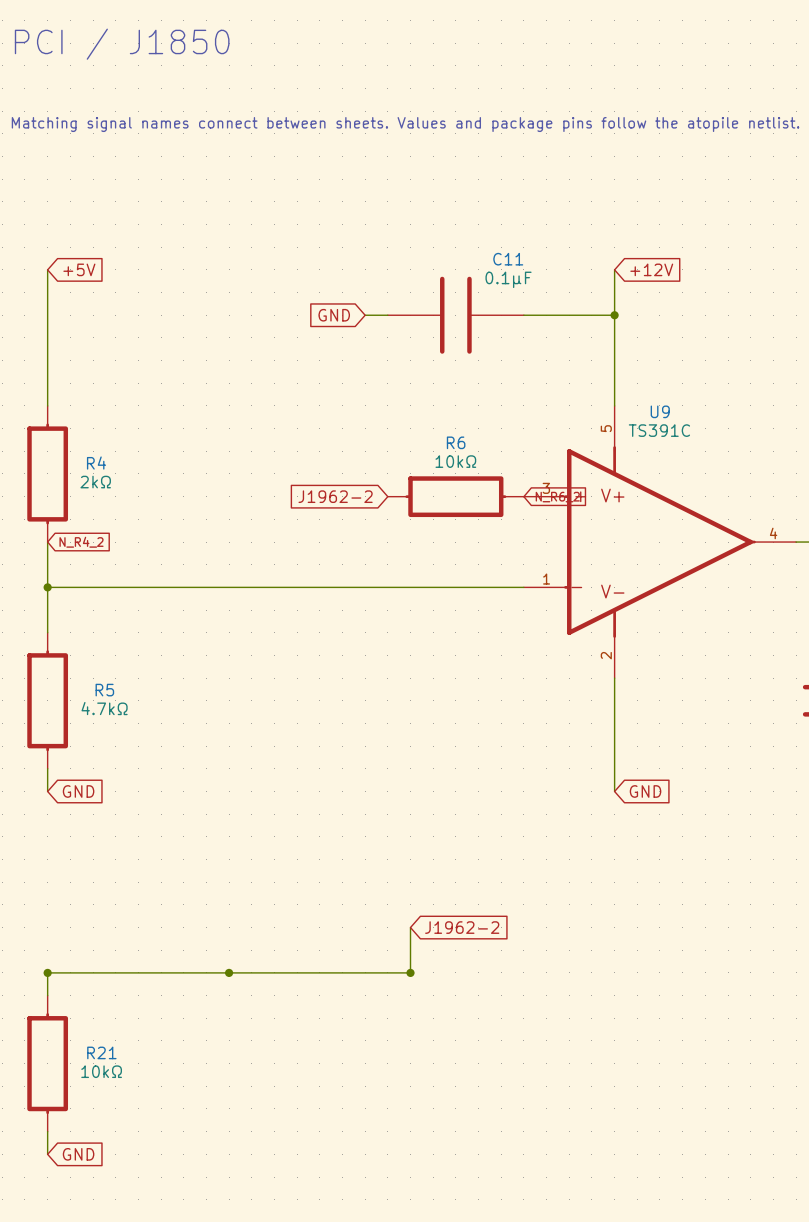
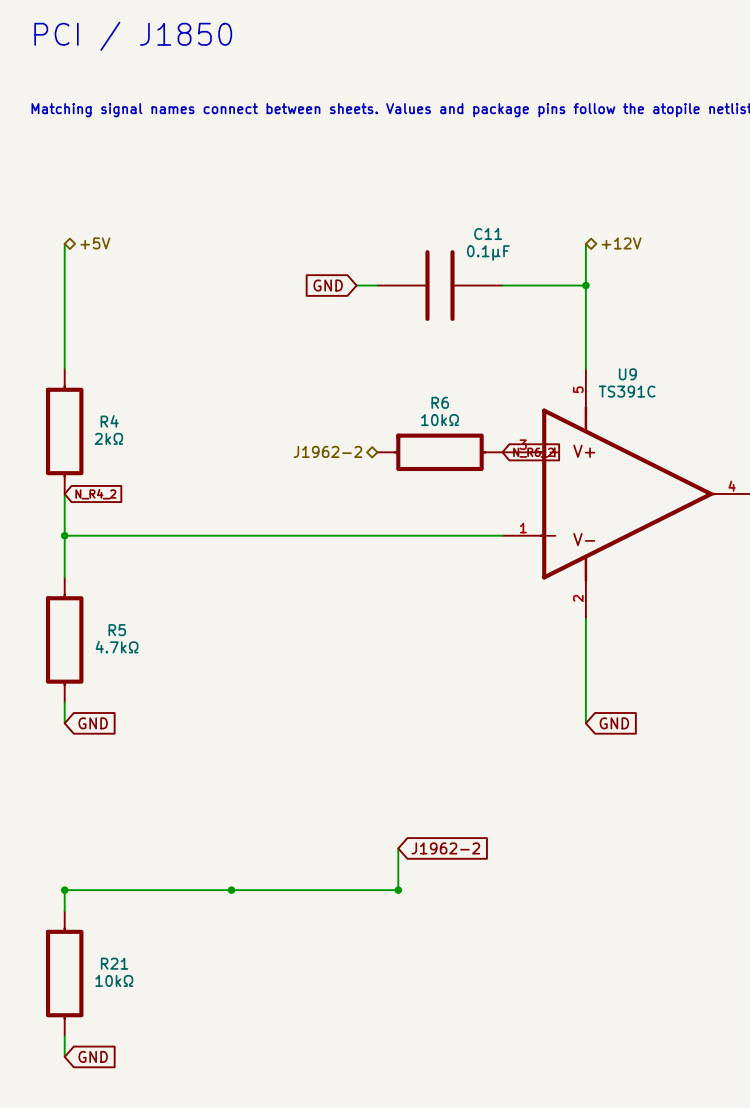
global label: +5V (79, 269) -> none
hierarchical label: none -> +5V (95, 243)
global label: +12V (651, 269) -> none
hierarchical label: none -> +12V (621, 243)
hierarchical label: none -> J1962-2 (327, 451)
global label: J1962-2 (335, 496) -> none

